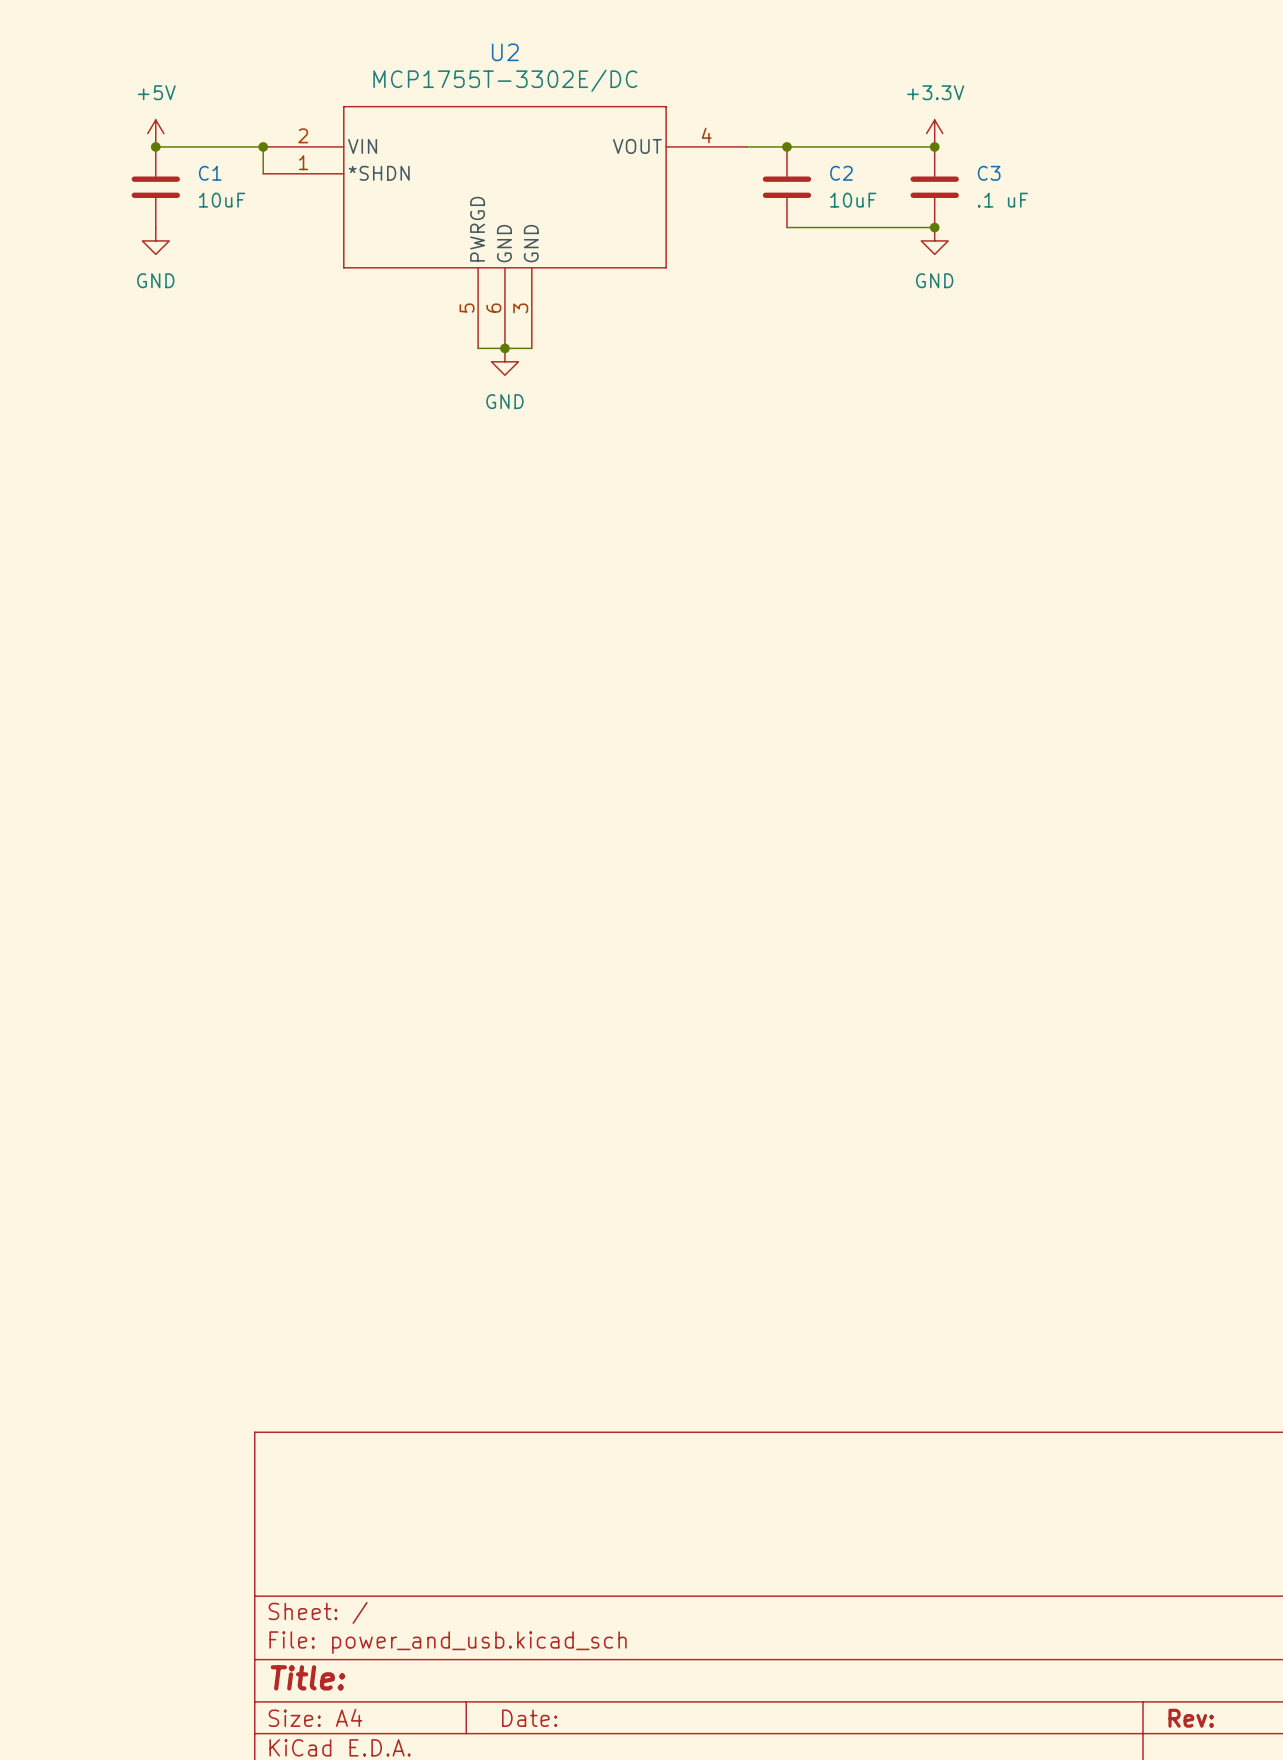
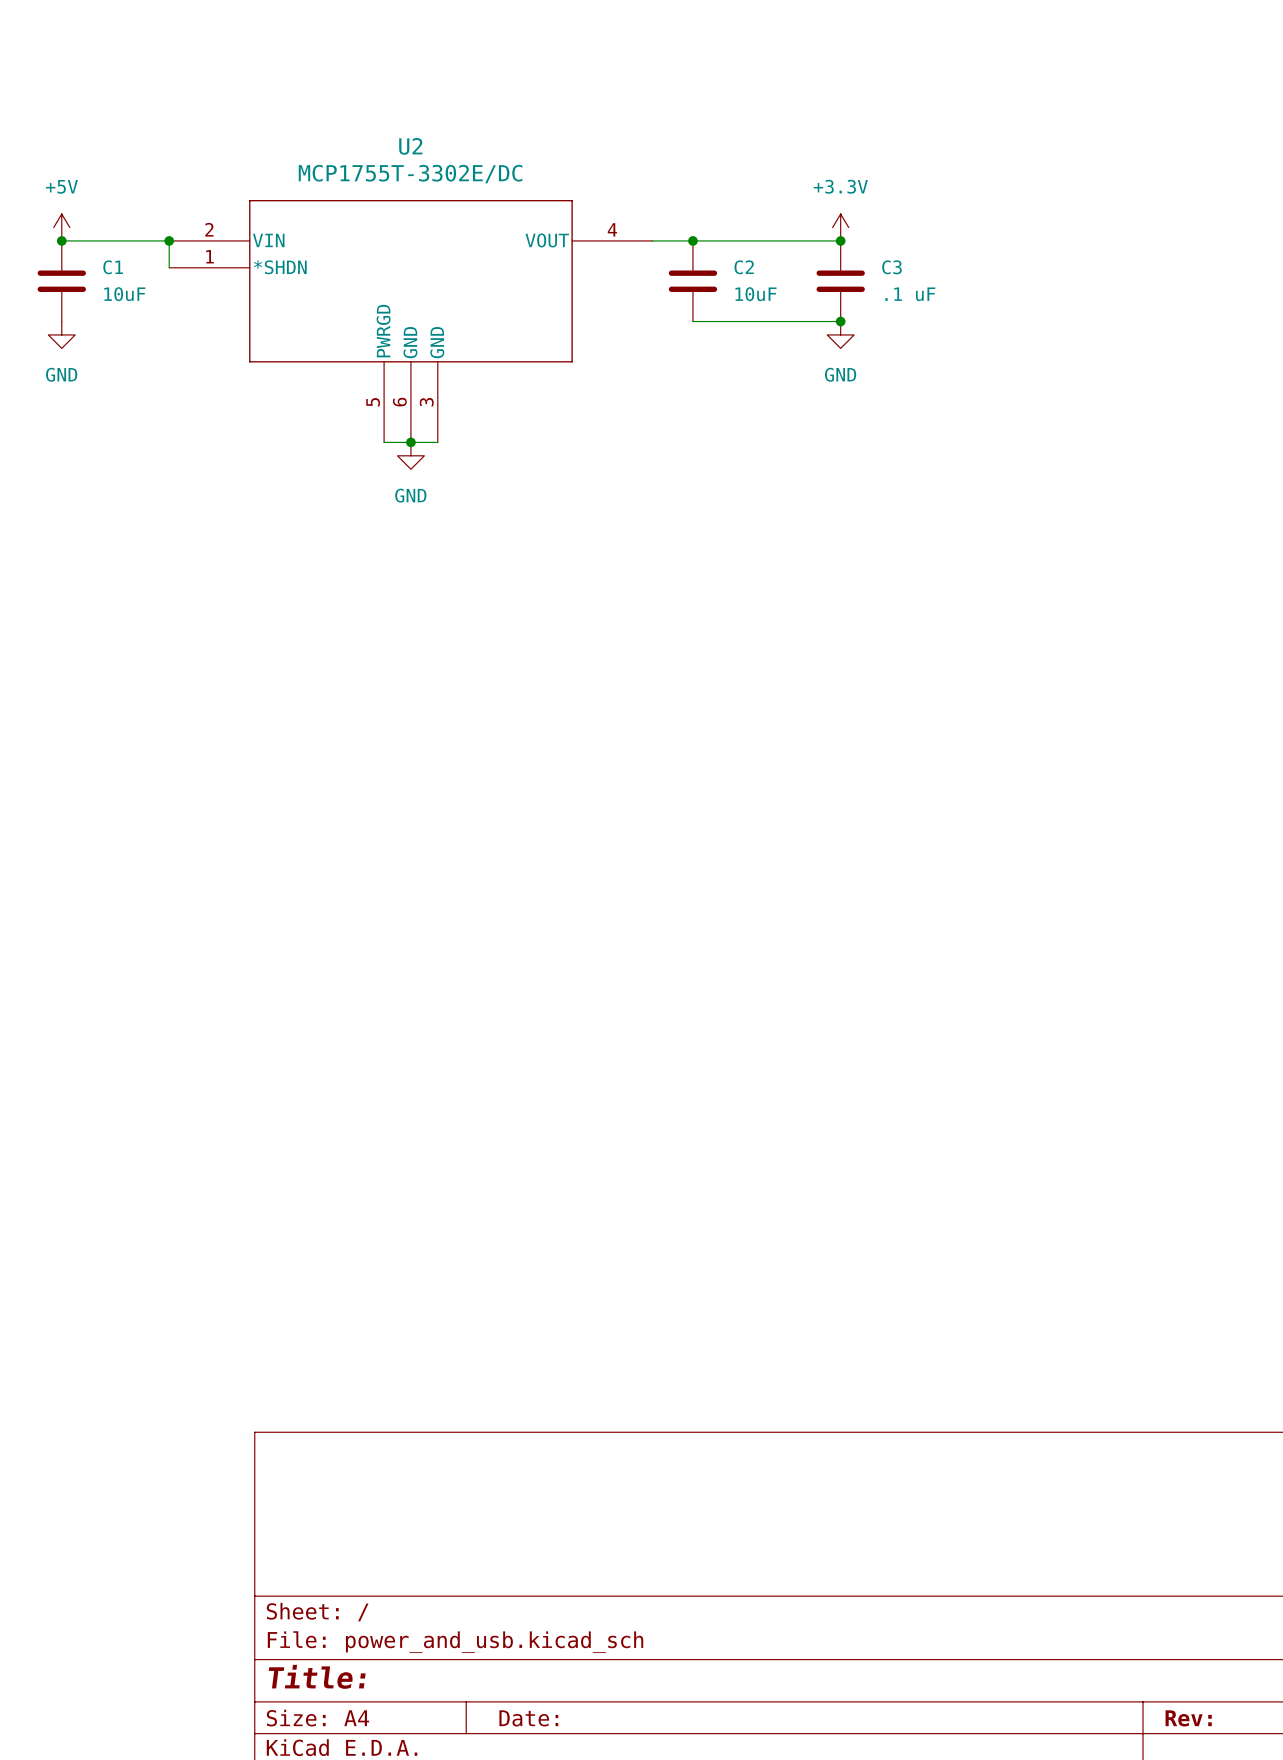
power symbol position: +5V (155, 133) -> +5V (61, 227)
power symbol position: +3.3V (934, 133) -> +3.3V (840, 227)
wire: (155, 146) (263, 146) (263, 173) -> (61, 240) (169, 240) (169, 267)
junction: (155, 146) -> none
junction: (263, 146) -> none
wire: (746, 146) (934, 146) -> (652, 240) (840, 240)
junction: (786, 146) -> none
junction: (934, 146) -> none
C1 position: (155, 187) -> (61, 281)
C2 position: (786, 187) -> (692, 281)
C3 position: (934, 187) -> (840, 281)
U2 position: (504, 227) -> (410, 321)
wire: (786, 227) (934, 227) -> (692, 321) (840, 321)
junction: (934, 227) -> none
junction: none -> (61, 240)
power symbol position: GND (155, 240) -> GND (61, 334)
junction: none -> (169, 240)
junction: none -> (692, 240)
junction: none -> (840, 240)
power symbol position: GND (934, 240) -> GND (840, 334)
junction: none -> (840, 321)
wire: (478, 348) (531, 348) -> (384, 442) (437, 442)
junction: (504, 348) -> none
power symbol position: GND (504, 361) -> GND (410, 455)
junction: none -> (410, 442)

